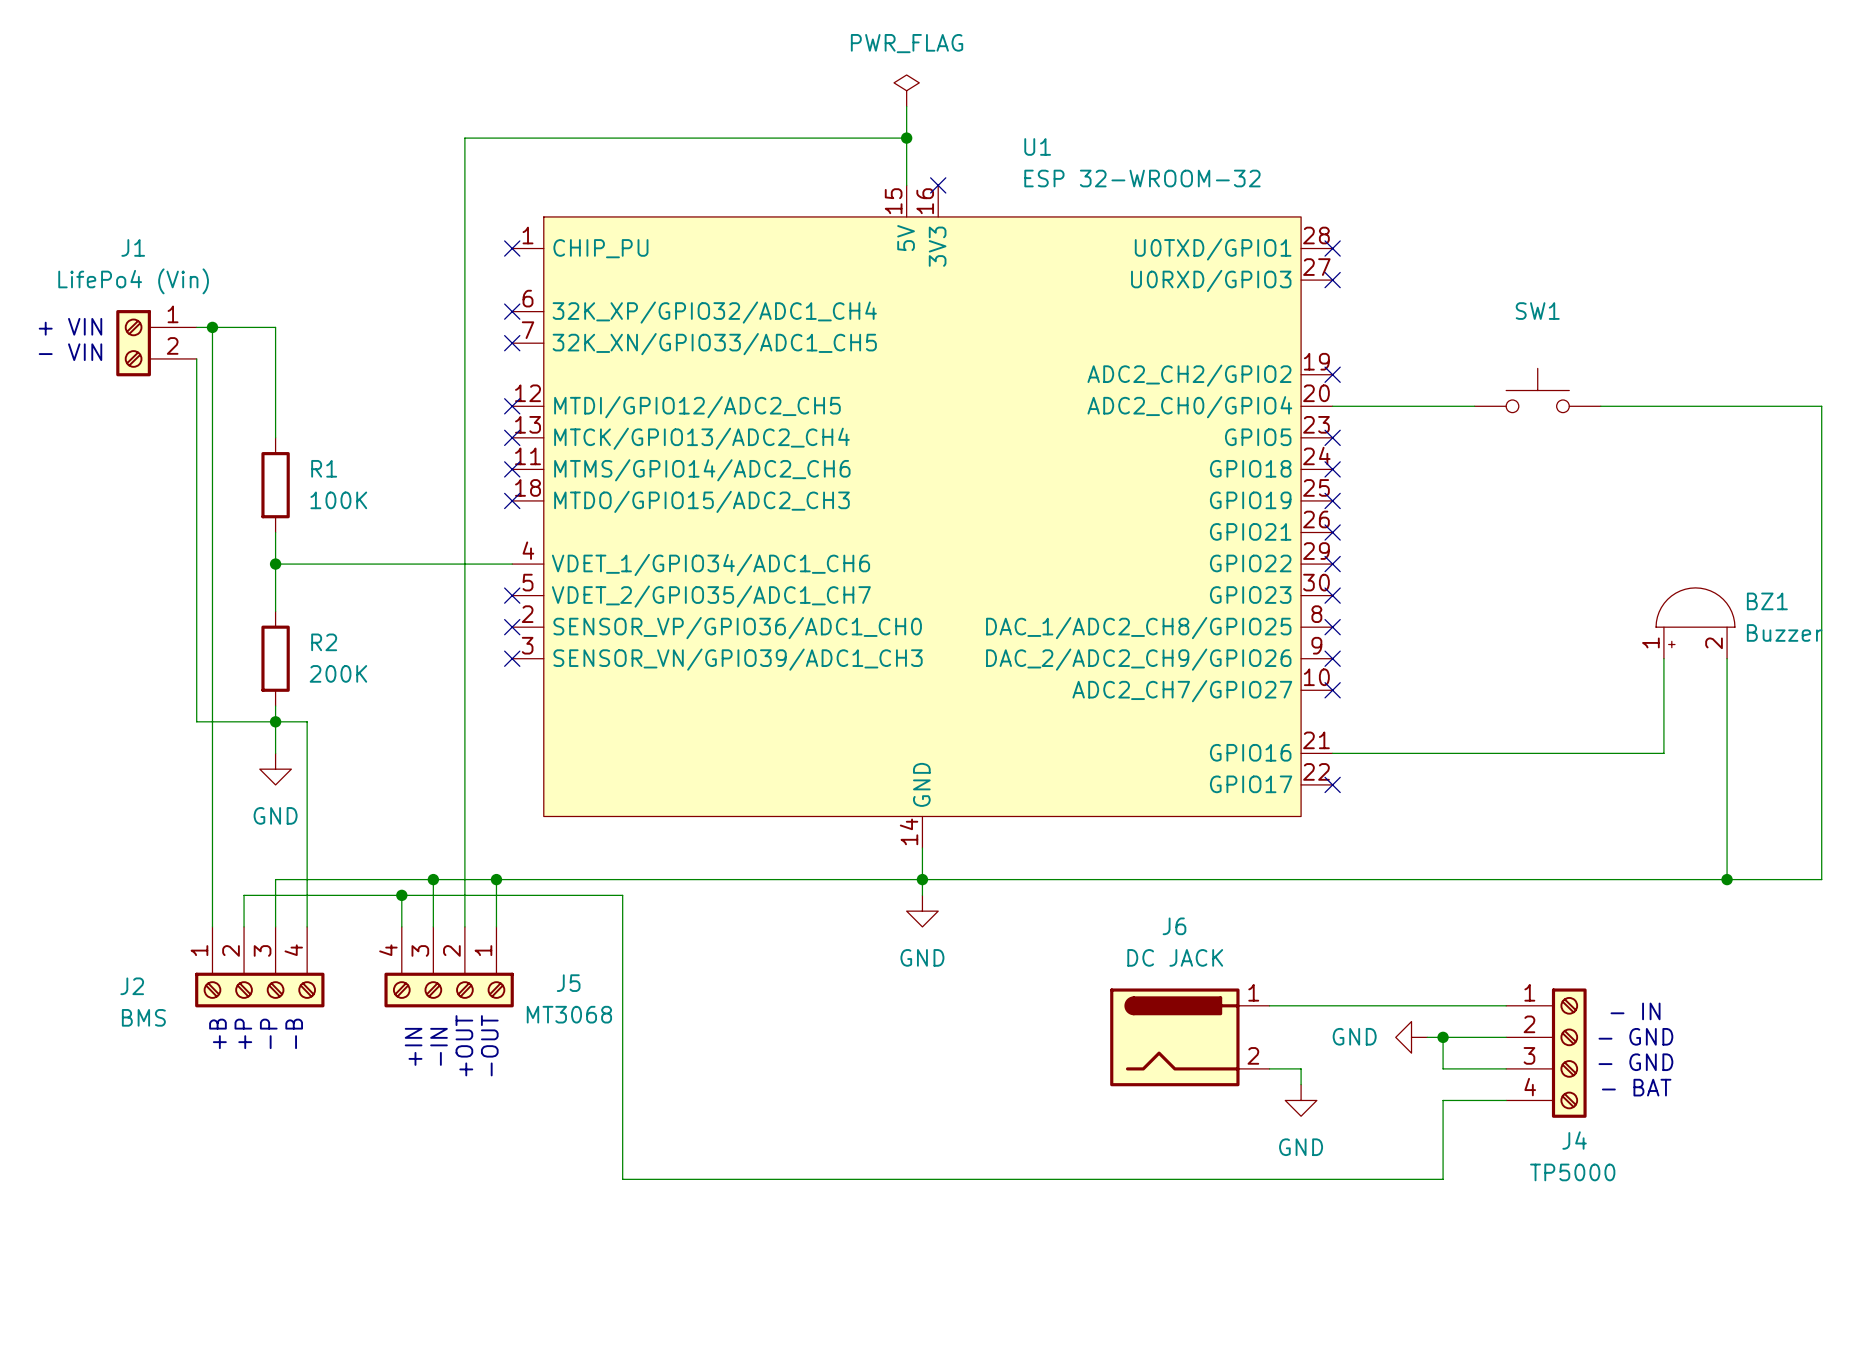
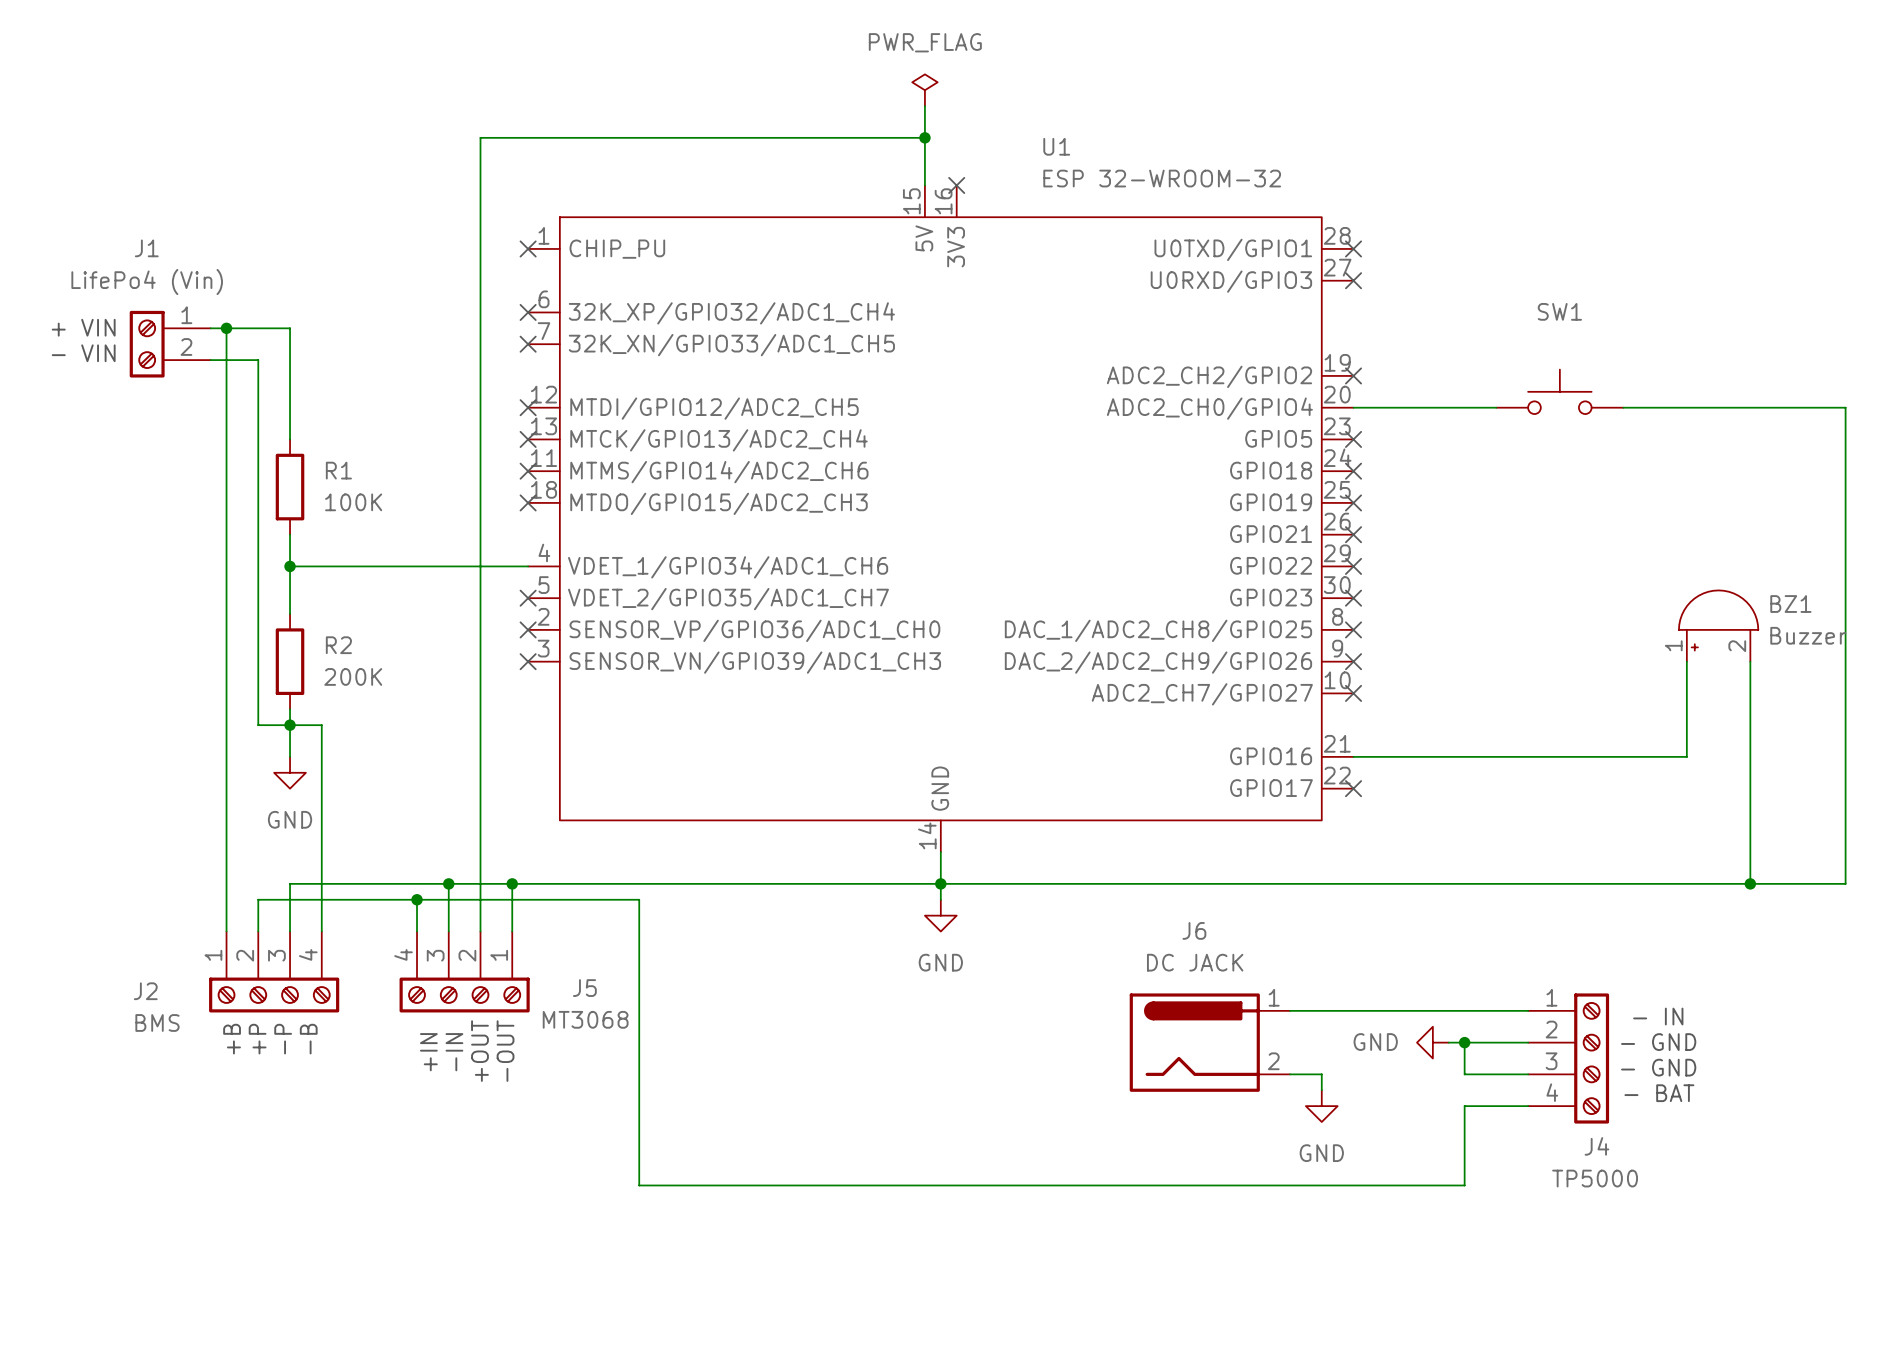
wire: (196, 358) (196, 721) (244, 721) -> (210, 360) (258, 360) (258, 725)

